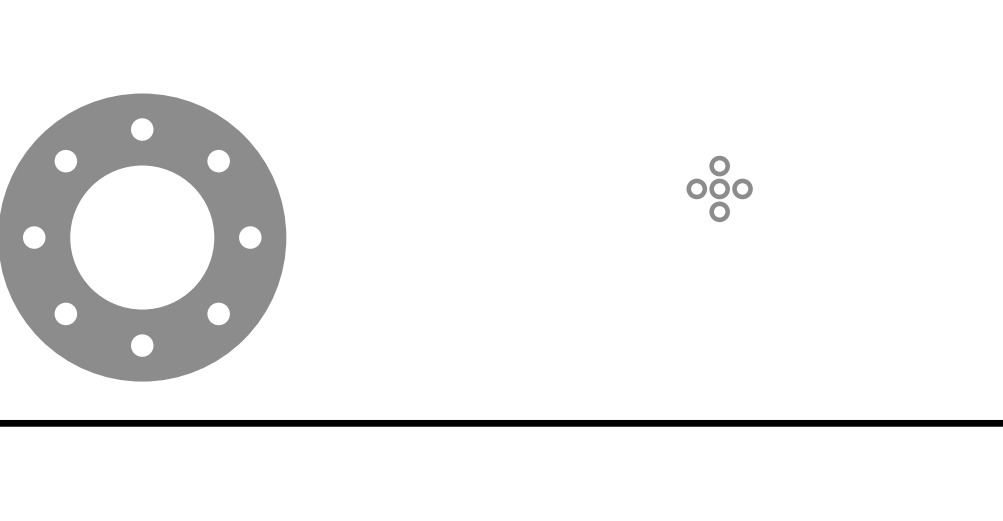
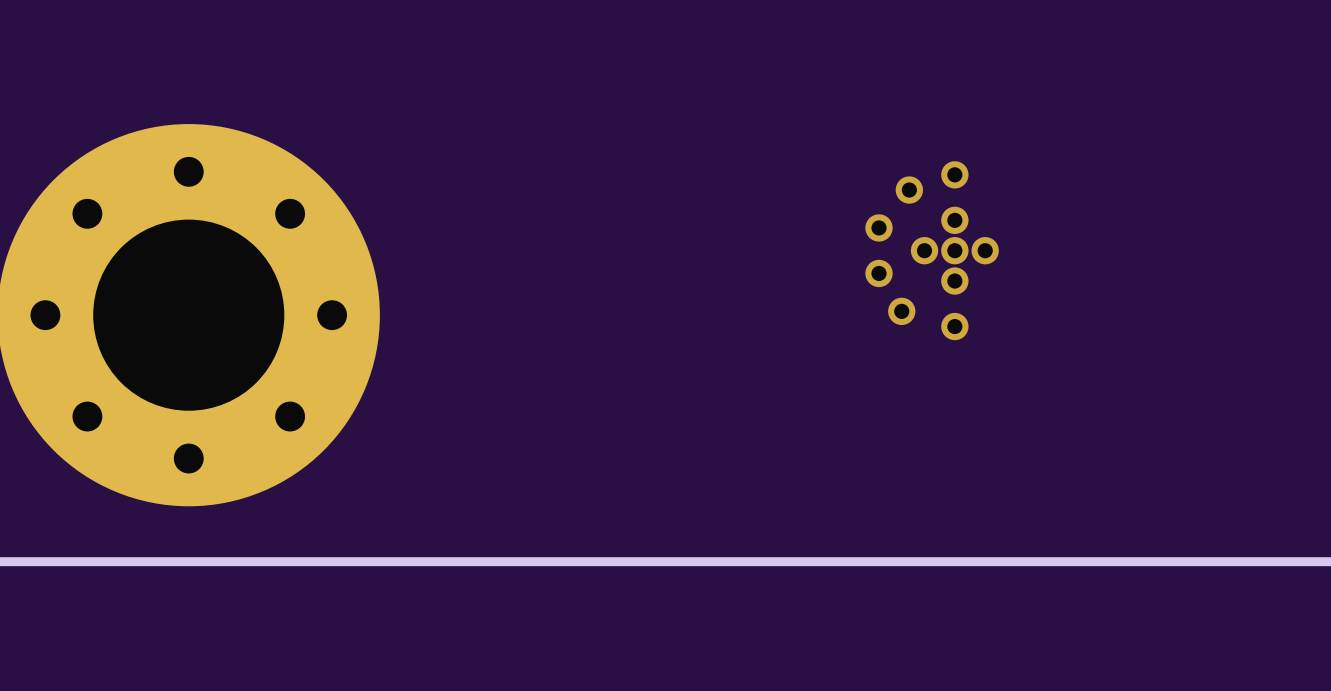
via: none -> (954, 174)
via: none -> (909, 190)
via: none -> (879, 227)
via: none -> (879, 273)
via: none -> (901, 311)
via: none -> (954, 326)

